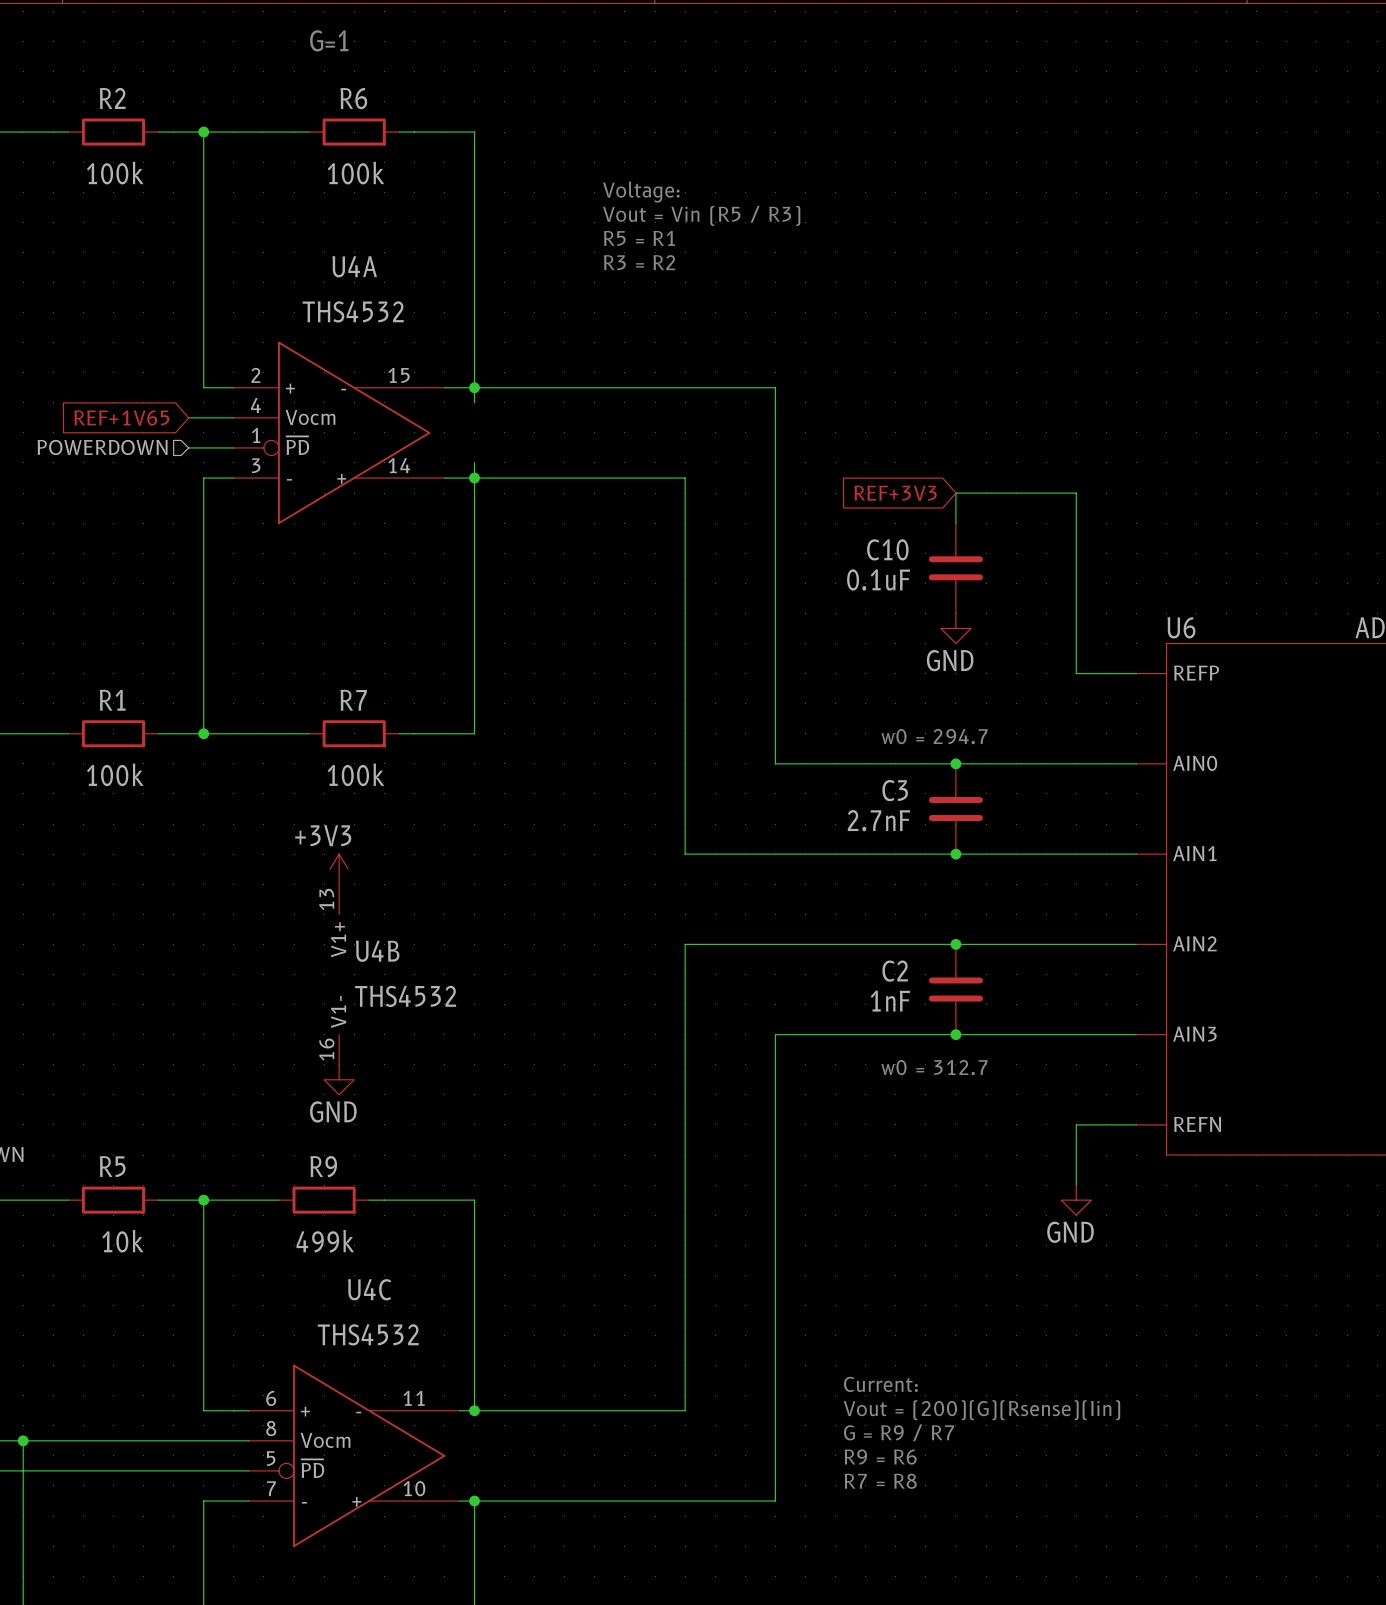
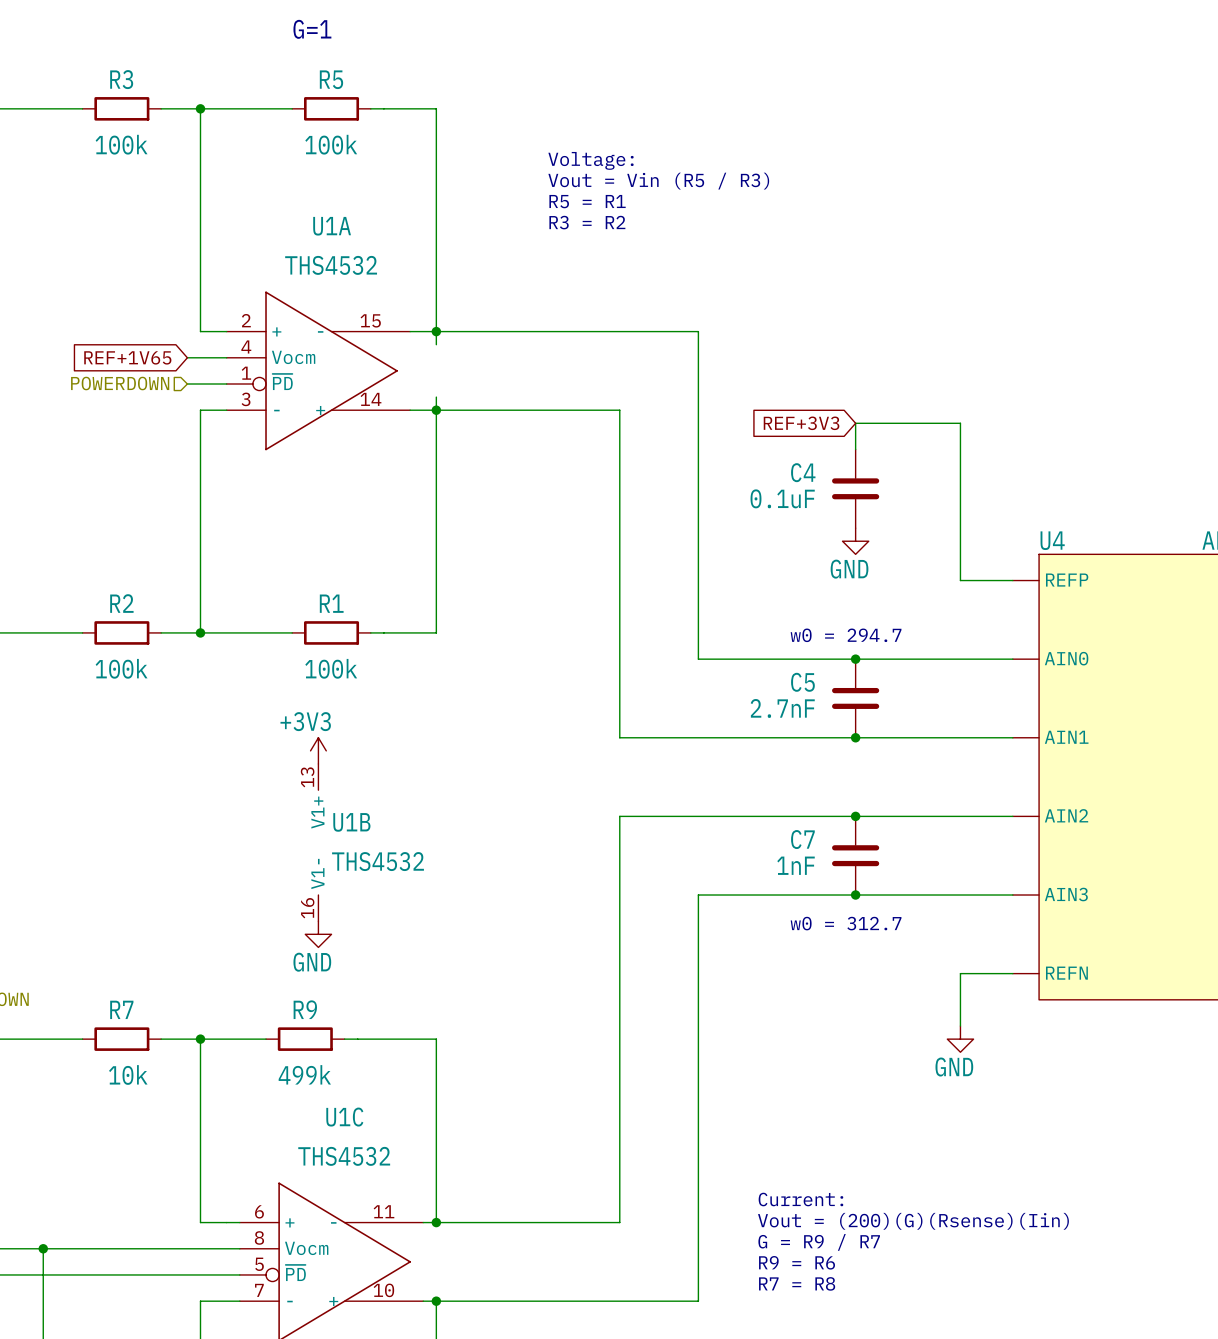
R2 name: R2 (112, 98) -> R3 (121, 79)
R6 name: R6 (353, 98) -> R5 (331, 79)
U4A name: U4A (354, 266) -> U1A (332, 226)
C10 name: C10 (887, 549) -> C4 (803, 472)
U6 name: U6 (1181, 627) -> U4 (1052, 540)
R1 name: R1 (112, 700) -> R2 (121, 603)
R7 name: R7 (353, 700) -> R1 (331, 603)
C3 name: C3 (895, 790) -> C5 (802, 682)
U4B name: U4B (377, 951) -> U1B (351, 822)
C2 name: C2 (895, 971) -> C7 (802, 839)
R5 name: R5 (112, 1166) -> R7 (121, 1009)
U4C name: U4C (369, 1289) -> U1C (344, 1117)

